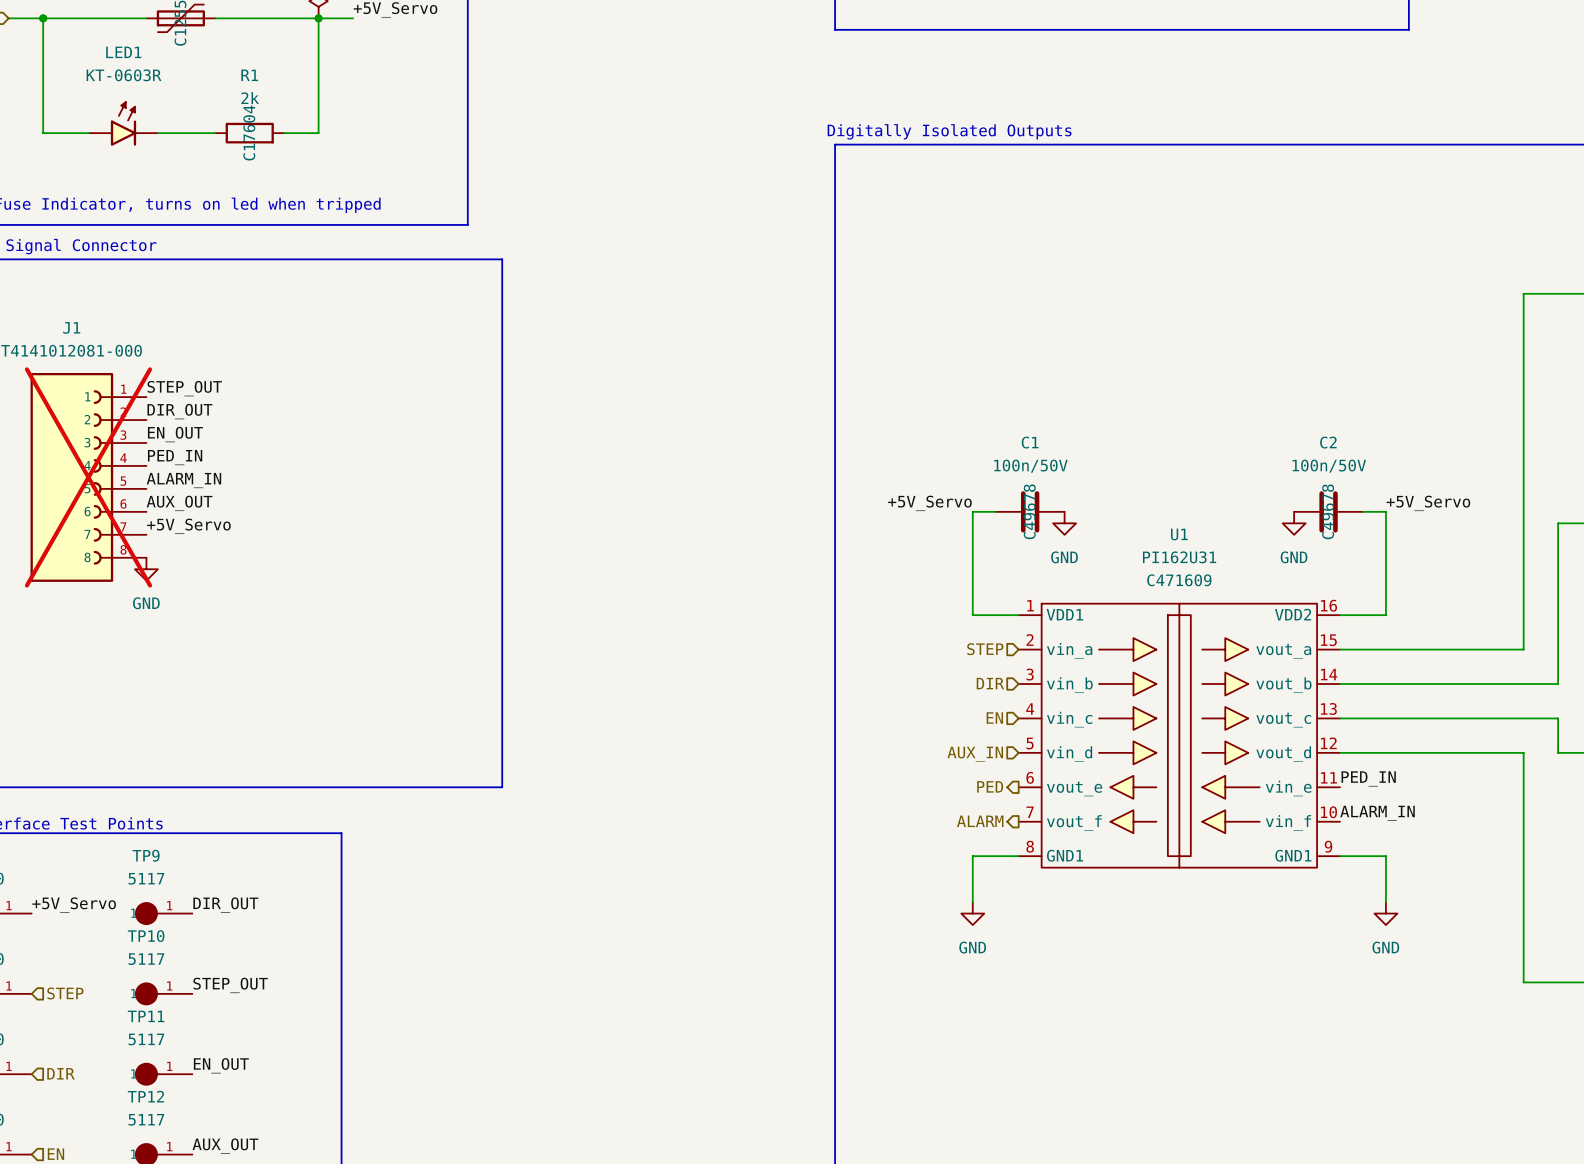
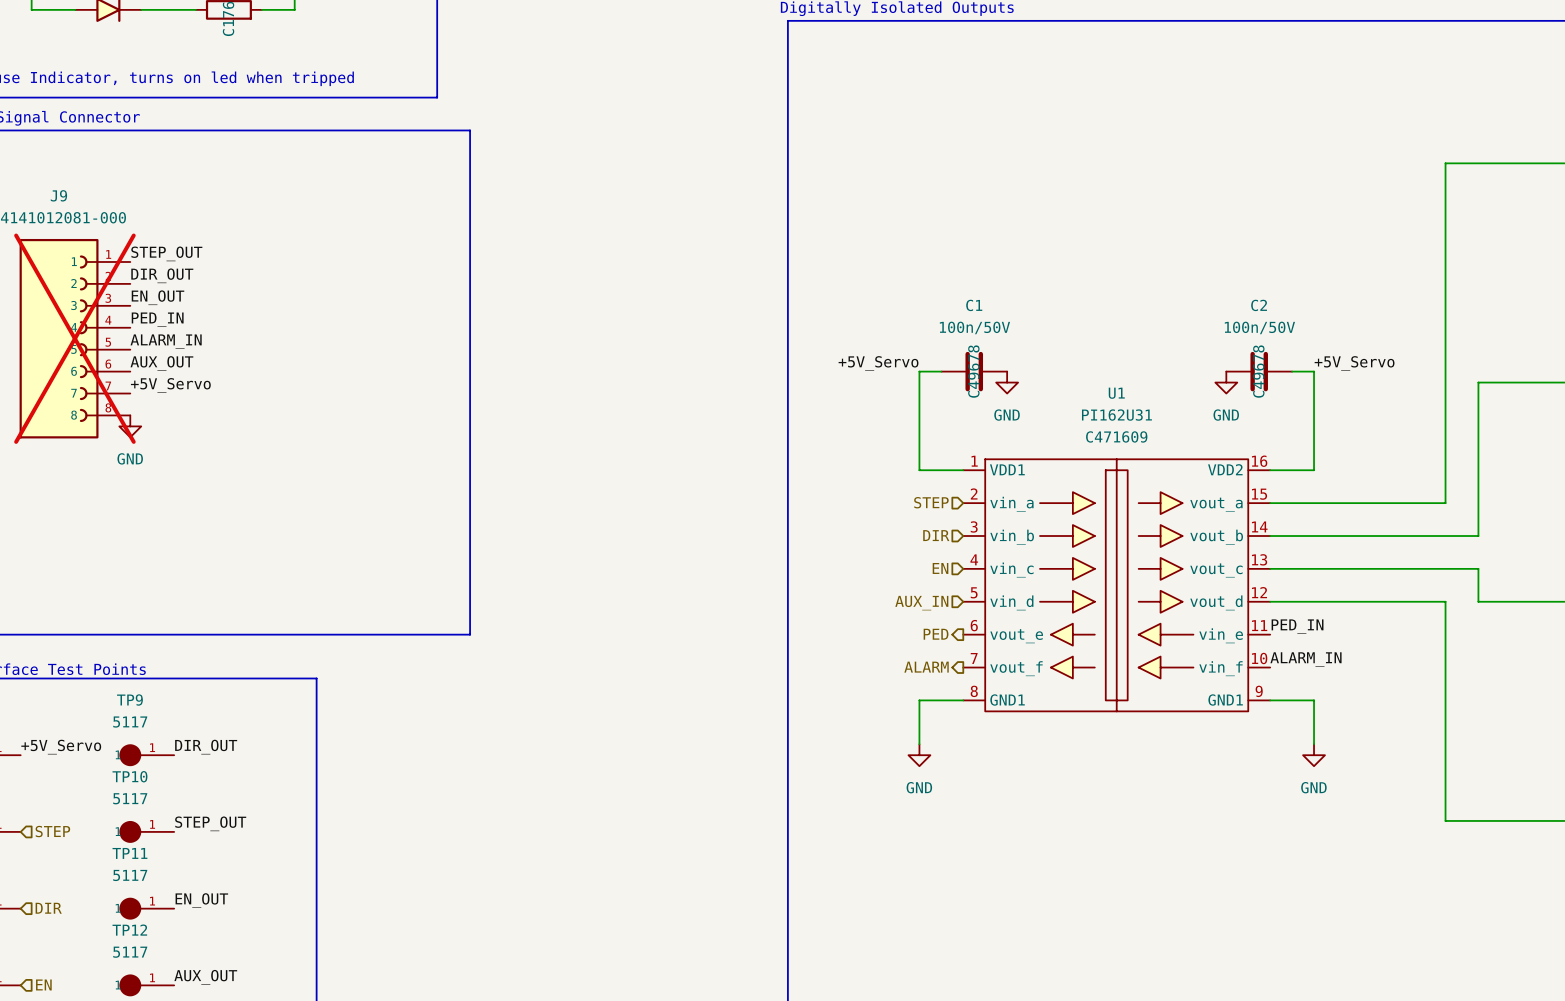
J1 name: J1 (71, 327) -> J9 (58, 195)

